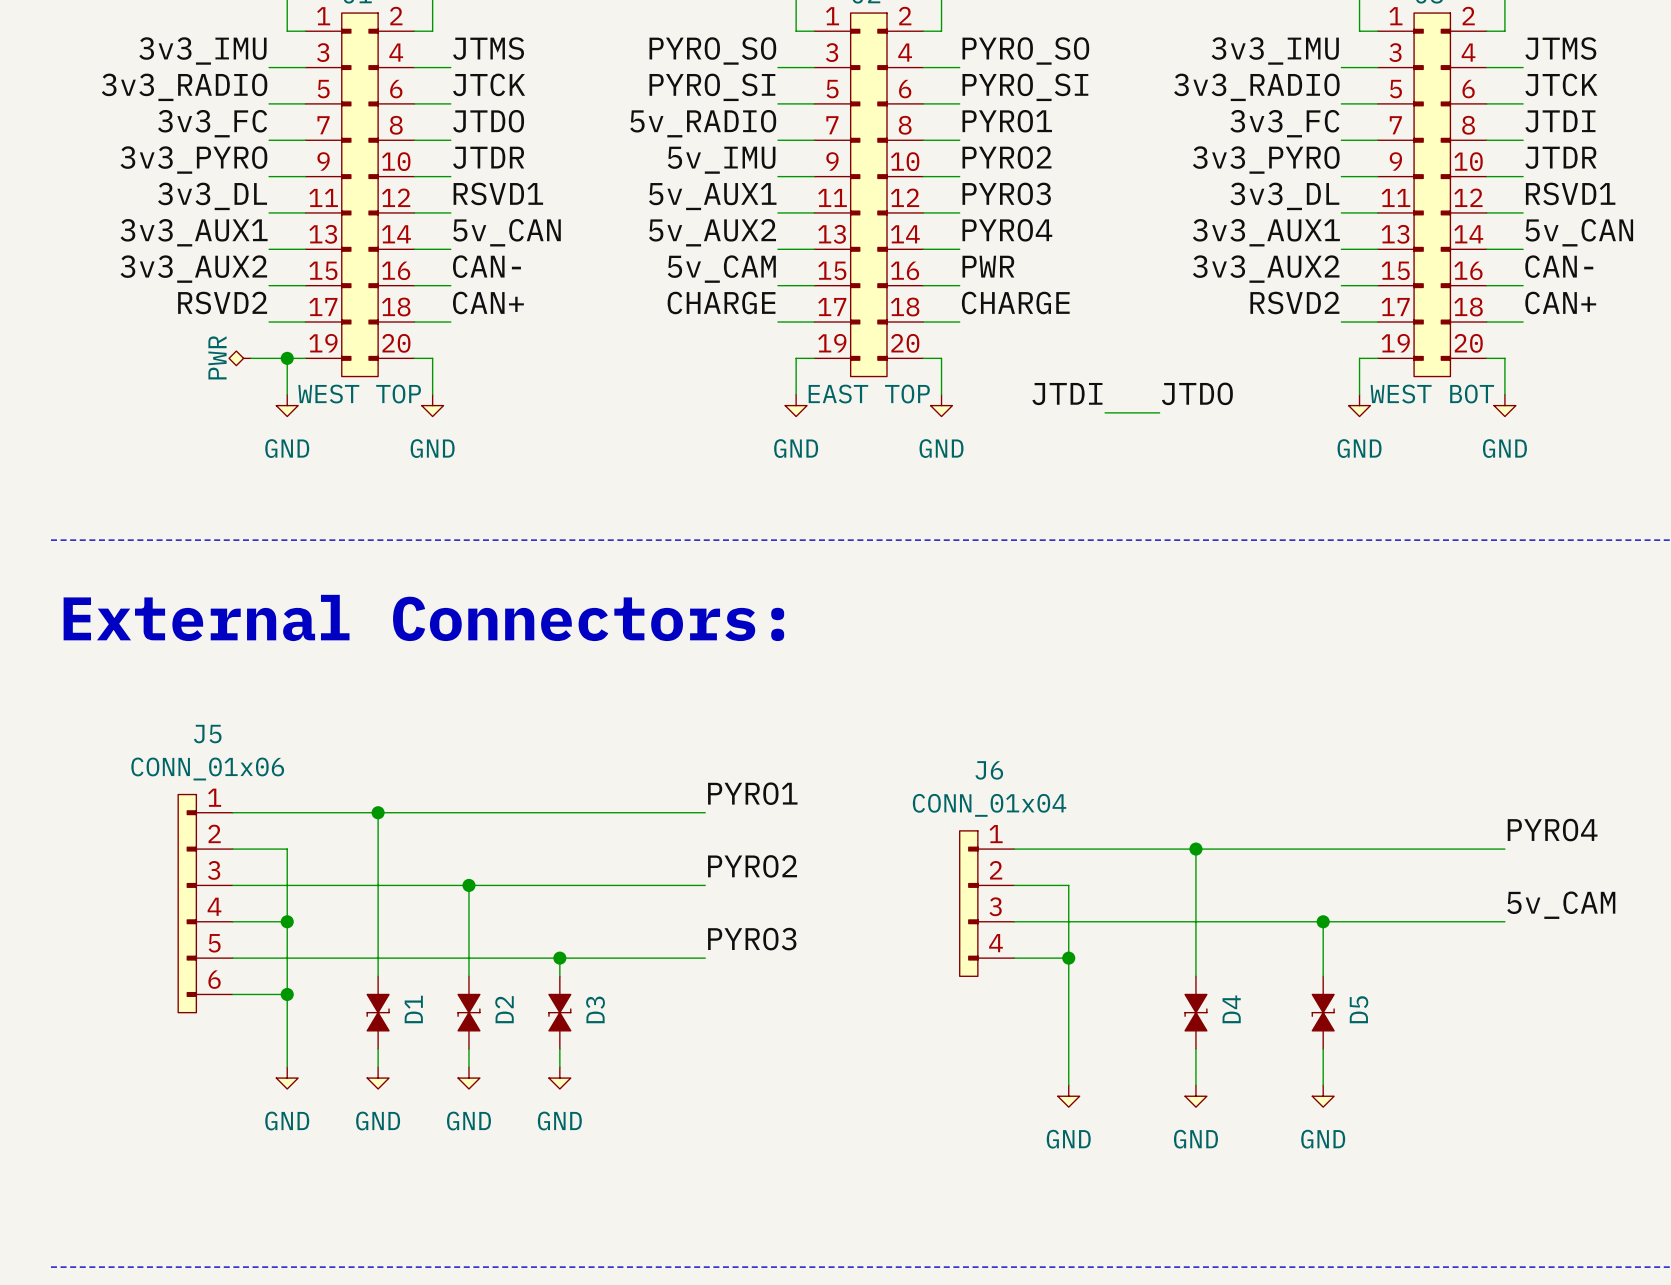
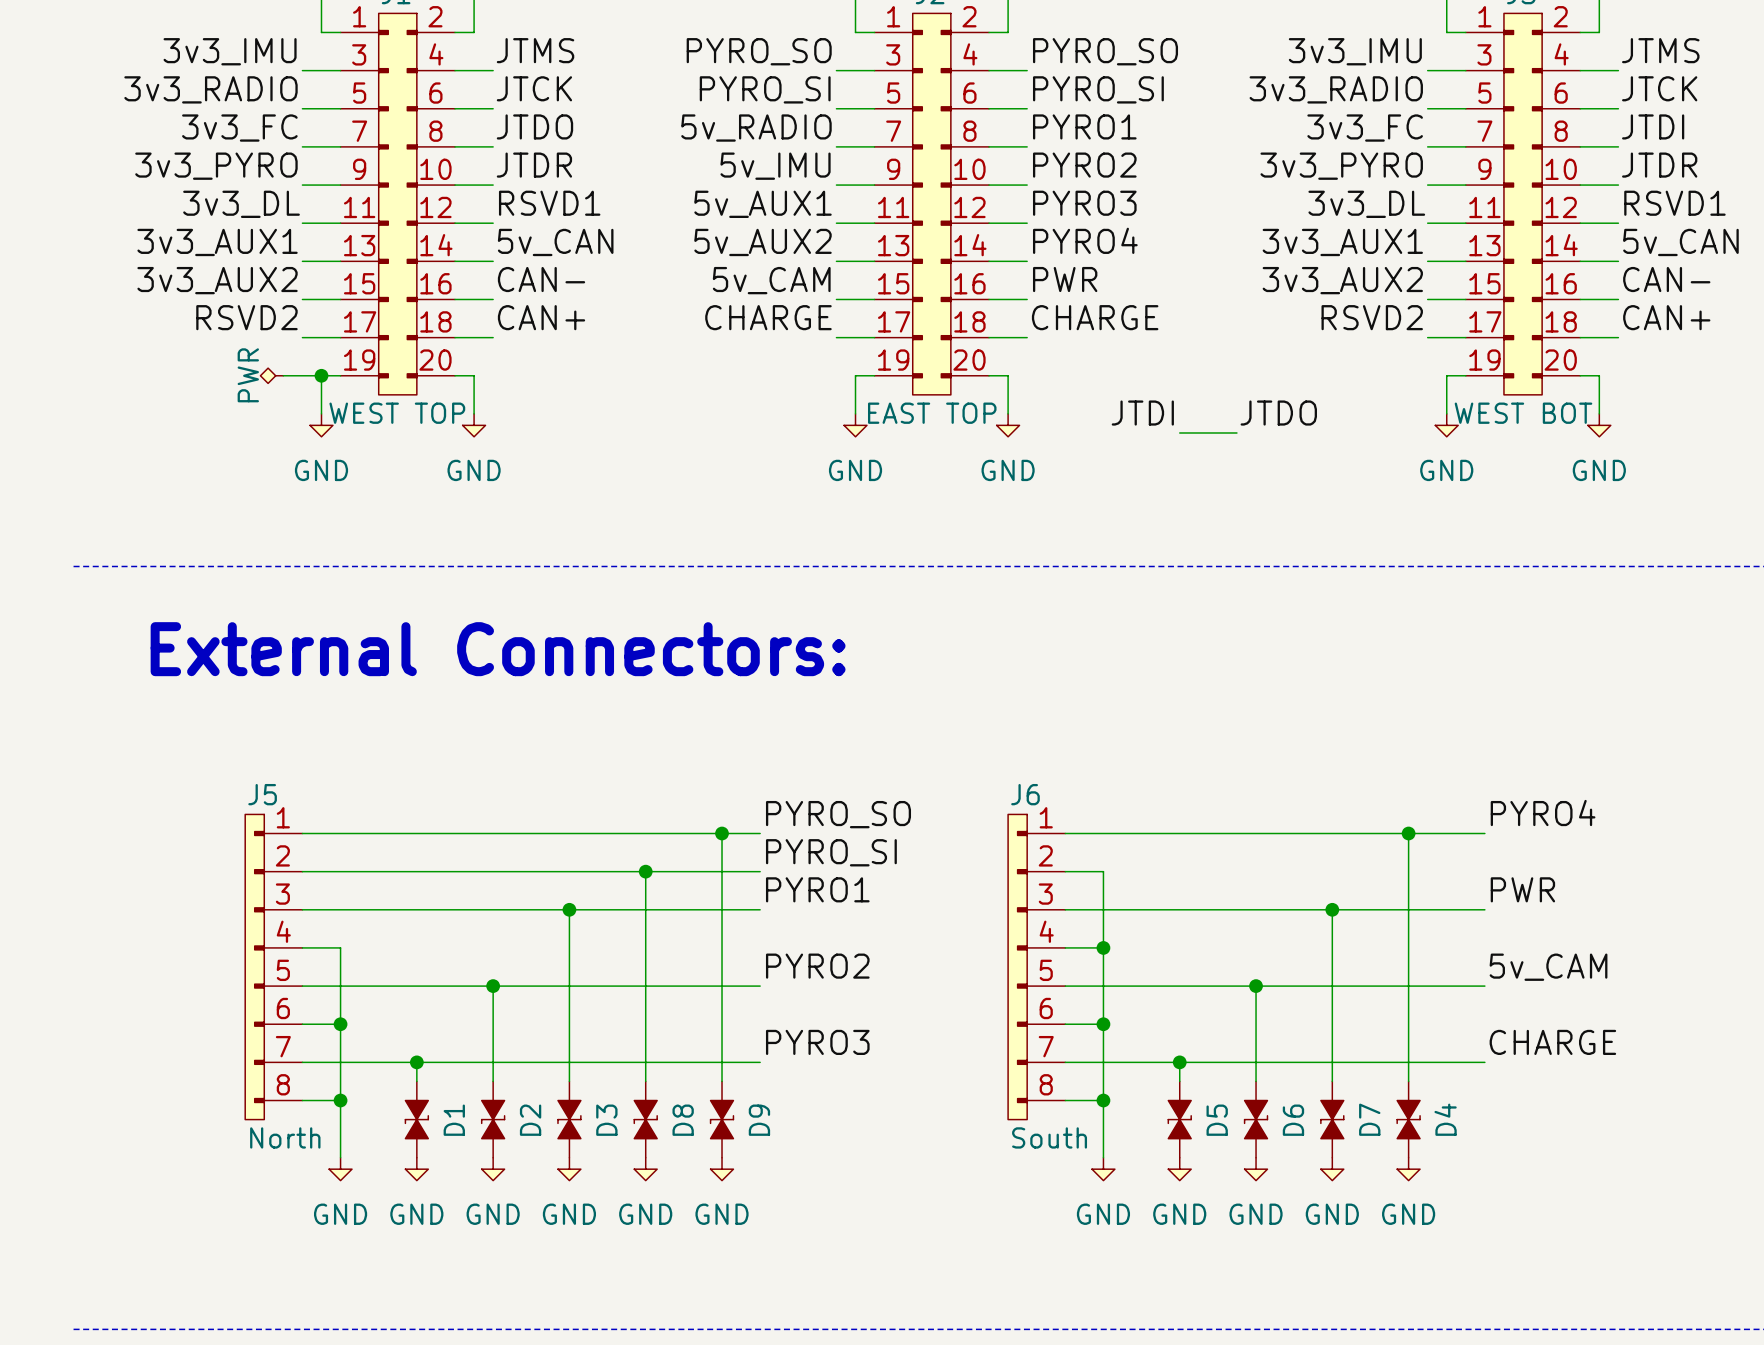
J5 value: CONN_01x06 (207, 769) -> North (285, 1137)
J6 name position: J6 (989, 770) -> J6 (1025, 794)
label: none -> PYRO_SO (838, 814)
label position: PYRO1 (752, 793) -> PYRO1 (817, 889)
J5 symbol: [178, 794, 233, 1013] -> [245, 814, 303, 1120]
wire: none -> (302, 833) (760, 833)
wire: none -> (722, 833) (722, 1081)
junction: none -> (722, 833)
wire: none -> (1065, 833) (1484, 833)
junction: none -> (1408, 833)
J6 value: CONN_01x04 (989, 805) -> South (1049, 1137)
wire: (232, 812) (705, 812) -> none
wire: (378, 812) (378, 976) -> (569, 909) (569, 1081)
junction: (378, 812) -> none
label: none -> PYRO_SI (831, 852)
wire: none -> (302, 871) (760, 871)
wire: none -> (645, 871) (645, 1081)
junction: none -> (645, 871)
J6 symbol: [959, 830, 1015, 977] -> [1008, 814, 1066, 1120]
wire: none -> (1065, 871) (1103, 871) (1103, 1157)
label position: PYRO4 (1552, 830) -> PYRO4 (1543, 812)
label: none -> PWR (1522, 889)
wire: (232, 849) (287, 849) (287, 1067) -> none
wire: (1014, 849) (1504, 849) -> none
wire: (1195, 849) (1195, 976) -> (1408, 833) (1408, 967)
junction: (1195, 849) -> none
label position: PYRO2 (752, 866) -> PYRO2 (817, 966)
wire: none -> (302, 909) (760, 909)
junction: none -> (569, 909)
wire: none -> (1065, 909) (1484, 909)
wire: none -> (1332, 909) (1332, 1081)
junction: none -> (1332, 909)
wire: (232, 885) (705, 885) -> none
wire: (468, 885) (468, 976) -> (493, 986) (493, 1081)
junction: (468, 885) -> none
wire: (1014, 885) (1068, 885) (1068, 1085) -> none
wire: none -> (302, 947) (340, 947) (340, 1157)
wire: none -> (1065, 947) (1103, 947)
junction: none -> (1103, 947)
label position: 5v_CAM (1561, 905) -> 5v_CAM (1548, 967)
wire: (232, 921) (287, 921) -> none
junction: (287, 921) -> none
wire: (1014, 921) (1504, 921) -> none
junction: (1323, 921) -> none
wire: none -> (302, 986) (760, 986)
junction: none -> (493, 986)
label position: PYRO3 (752, 939) -> PYRO3 (817, 1042)
wire: none -> (1065, 986) (1484, 986)
wire: none -> (1256, 986) (1256, 1081)
junction: none -> (1256, 986)
wire: (232, 958) (705, 958) -> none
wire: (559, 958) (559, 976) -> none
junction: (559, 958) -> none
wire: (1014, 958) (1068, 958) -> none
junction: (1068, 958) -> none
wire: none -> (302, 1024) (340, 1024)
wire: none -> (1065, 1024) (1103, 1024)
junction: none -> (1103, 1024)
label: none -> CHARGE (1552, 1042)
wire: (232, 994) (287, 994) -> none
junction position: (287, 994) -> (340, 1024)
wire: none -> (302, 1062) (760, 1062)
D1 position: (378, 1012) -> (416, 1119)
junction: none -> (416, 1062)
D2 position: (468, 1012) -> (493, 1119)
D3 position: (559, 1012) -> (569, 1119)
wire: none -> (1065, 1062) (1484, 1062)
wire: none -> (1179, 1062) (1179, 1081)
junction: none -> (1179, 1062)
D4 position: (1195, 1012) -> (1408, 1119)
D5 position: (1323, 1012) -> (1179, 1119)
wire: none -> (302, 1100) (340, 1100)
junction: none -> (340, 1100)
wire: (468, 1048) (468, 1067) -> none
wire: (559, 1048) (559, 1067) -> none
wire: none -> (1065, 1100) (1103, 1100)
junction: none -> (1103, 1100)
wire: (1195, 1048) (1195, 1085) -> none
D8: none -> (645, 1119)
D9: none -> (722, 1119)
D6: none -> (1256, 1119)
D7: none -> (1332, 1119)
power symbol: GND (287, 1078) -> none
power symbol position: GND (378, 1078) -> GND (416, 1169)
power symbol: GND (468, 1078) -> none
power symbol: GND (559, 1078) -> none
power symbol: GND (1068, 1096) -> none
power symbol position: GND (1195, 1096) -> GND (1256, 1169)
power symbol position: GND (1323, 1096) -> GND (1408, 1169)
power symbol: none -> GND (340, 1169)
power symbol: none -> GND (493, 1169)
power symbol: none -> GND (569, 1169)
power symbol: none -> GND (645, 1169)
power symbol: none -> GND (722, 1169)
power symbol: none -> GND (1103, 1169)
power symbol: none -> GND (1179, 1169)
power symbol: none -> GND (1332, 1169)

